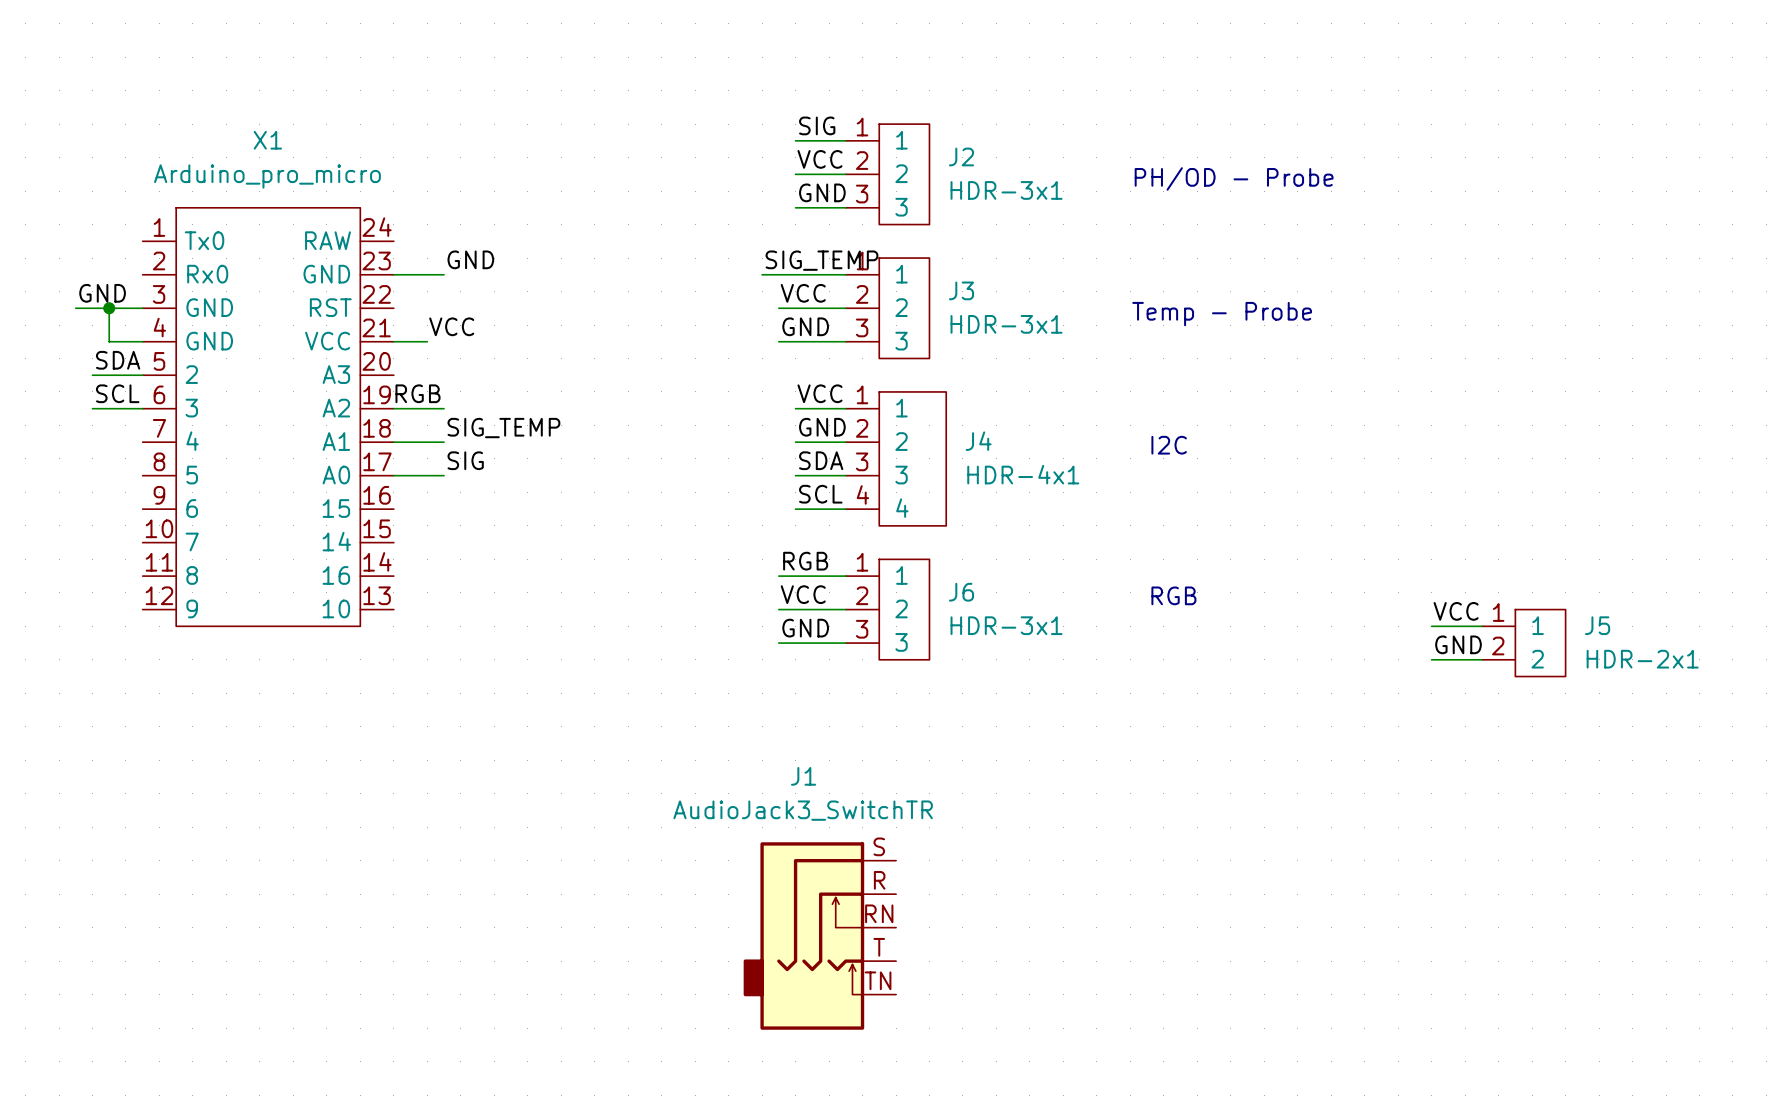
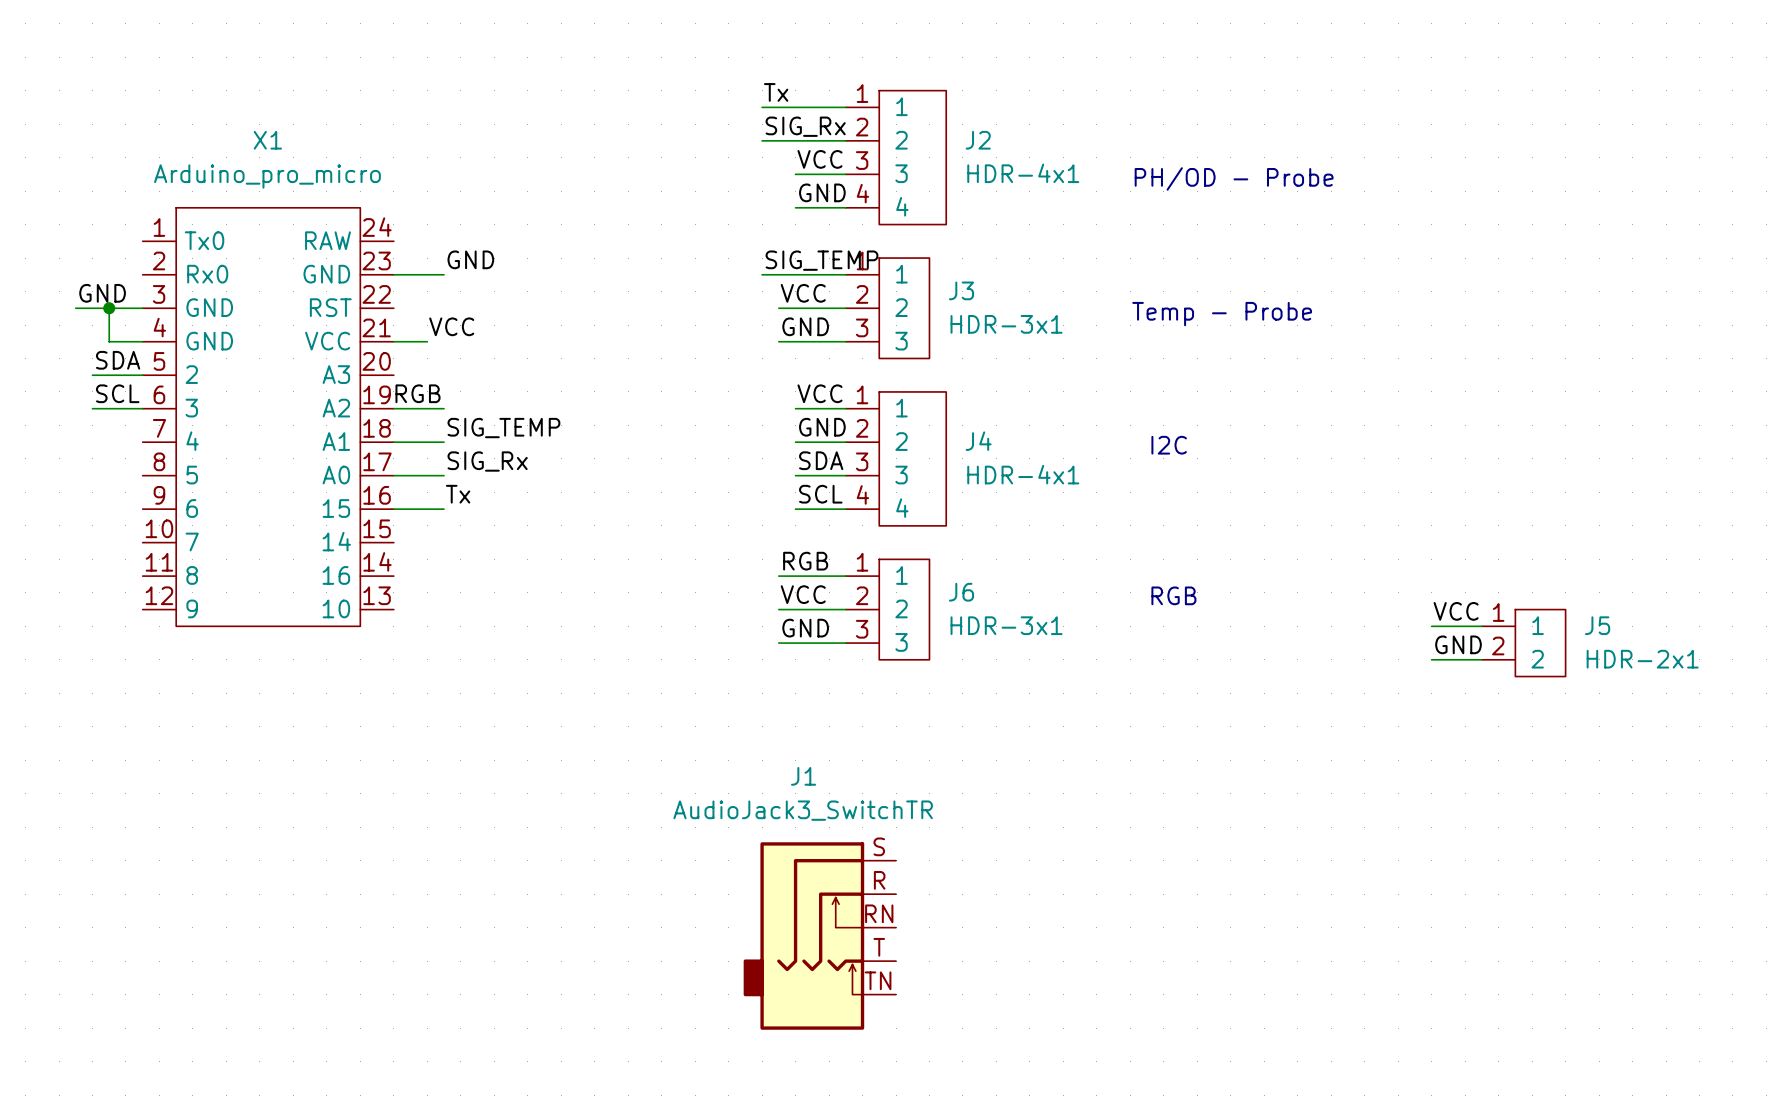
label: none -> Tx (776, 92)
wire: none -> (762, 107) (845, 107)
J2 symbol: [845, 124, 930, 225] -> [845, 90, 947, 225]
label: SIG (817, 125) -> SIG_Rx (805, 126)
wire: none -> (762, 140) (795, 140)
J2 value: HDR-3x1 (1006, 190) -> HDR-4x1 (1023, 173)
label: SIG (465, 460) -> SIG_Rx (487, 461)
label: none -> Tx (458, 494)
wire: none -> (393, 509) (444, 509)

